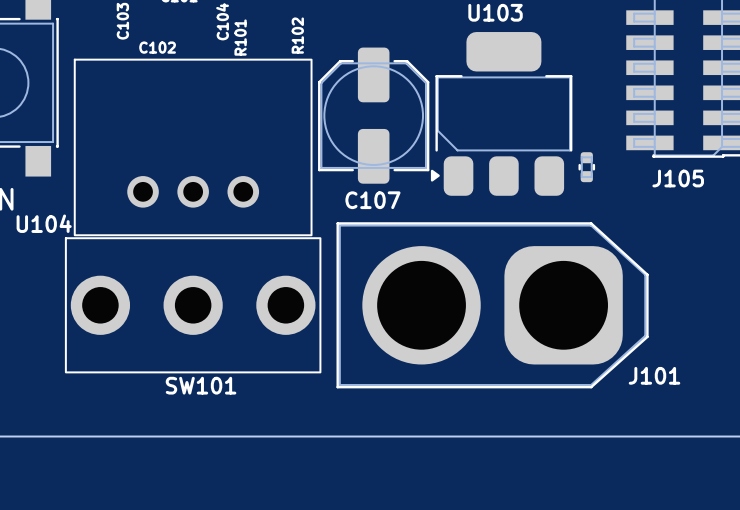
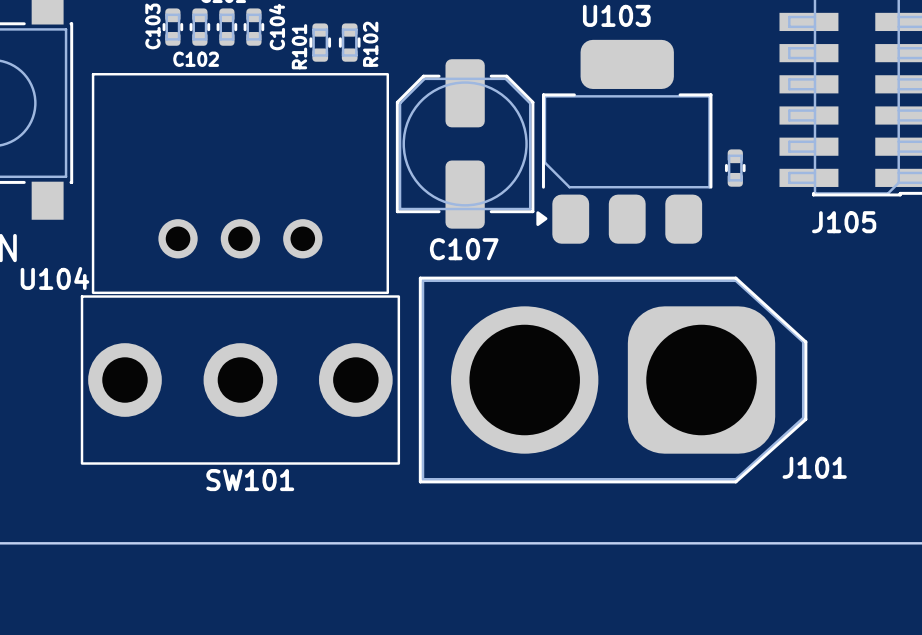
part: none -> (172, 27)
part: none -> (199, 27)
part: none -> (226, 27)
part: none -> (253, 27)
part: none -> (320, 42)
part: none -> (349, 42)
part position: (586, 167) -> (735, 168)

